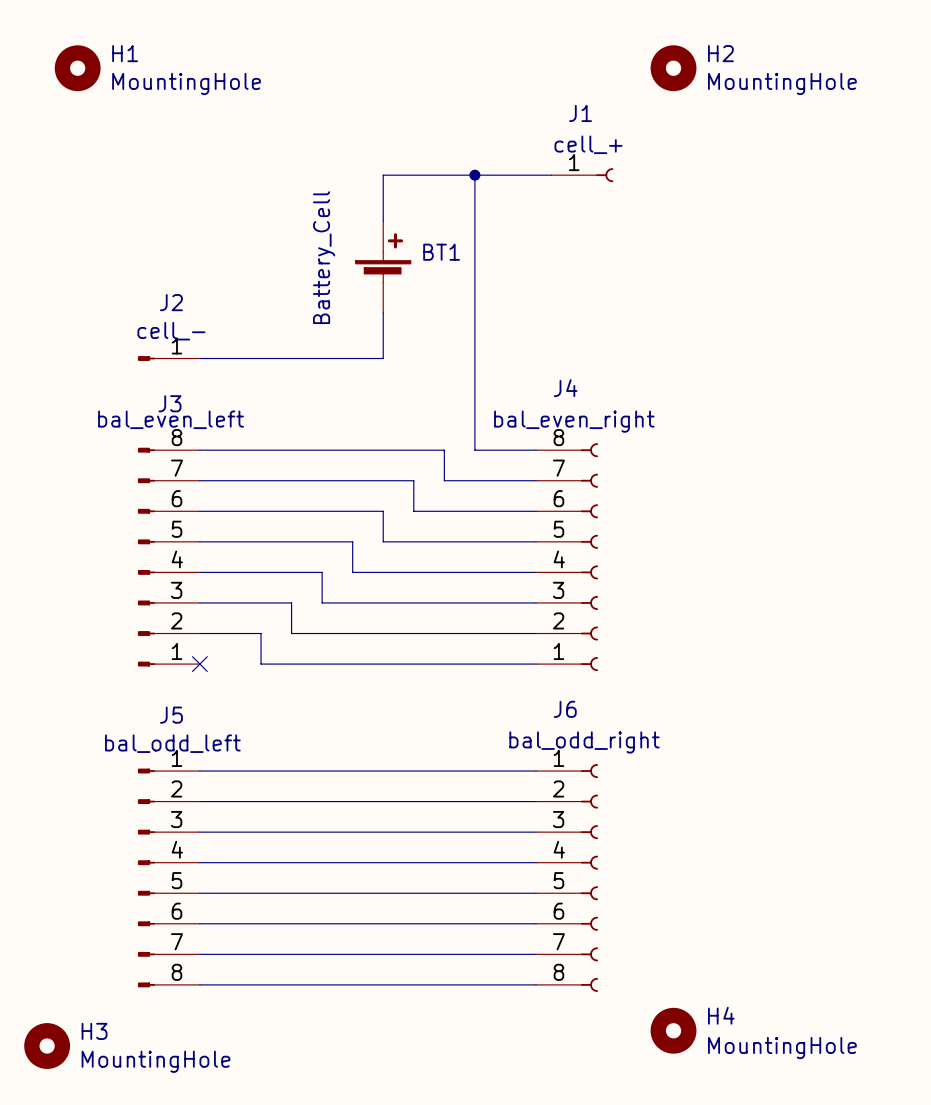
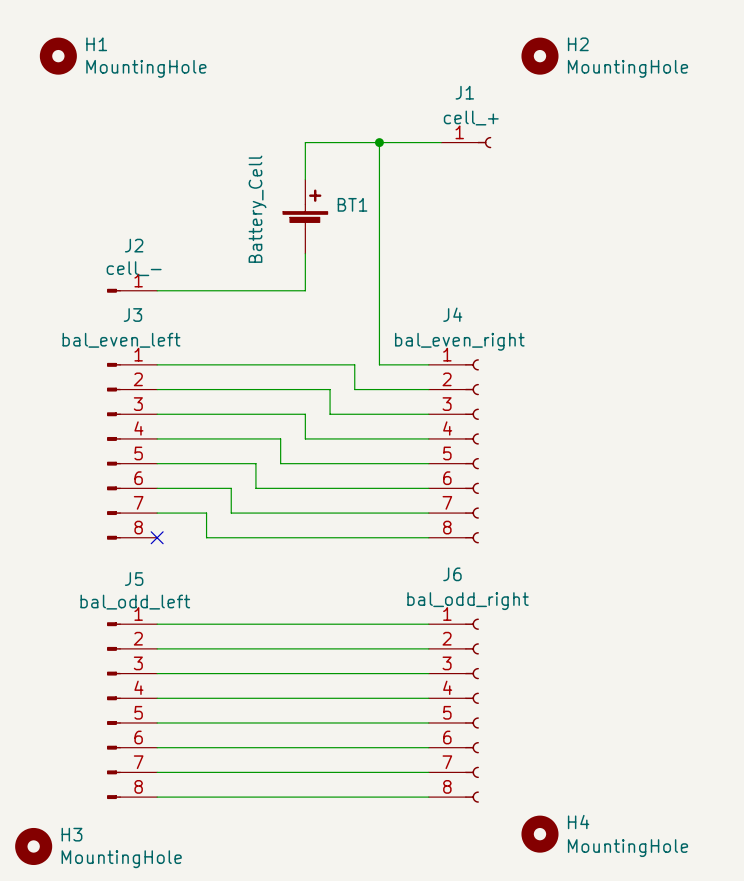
J3 flip: as is (146, 557) -> up-down (113, 451)
J4 flip: as is (589, 557) -> up-down (472, 451)

